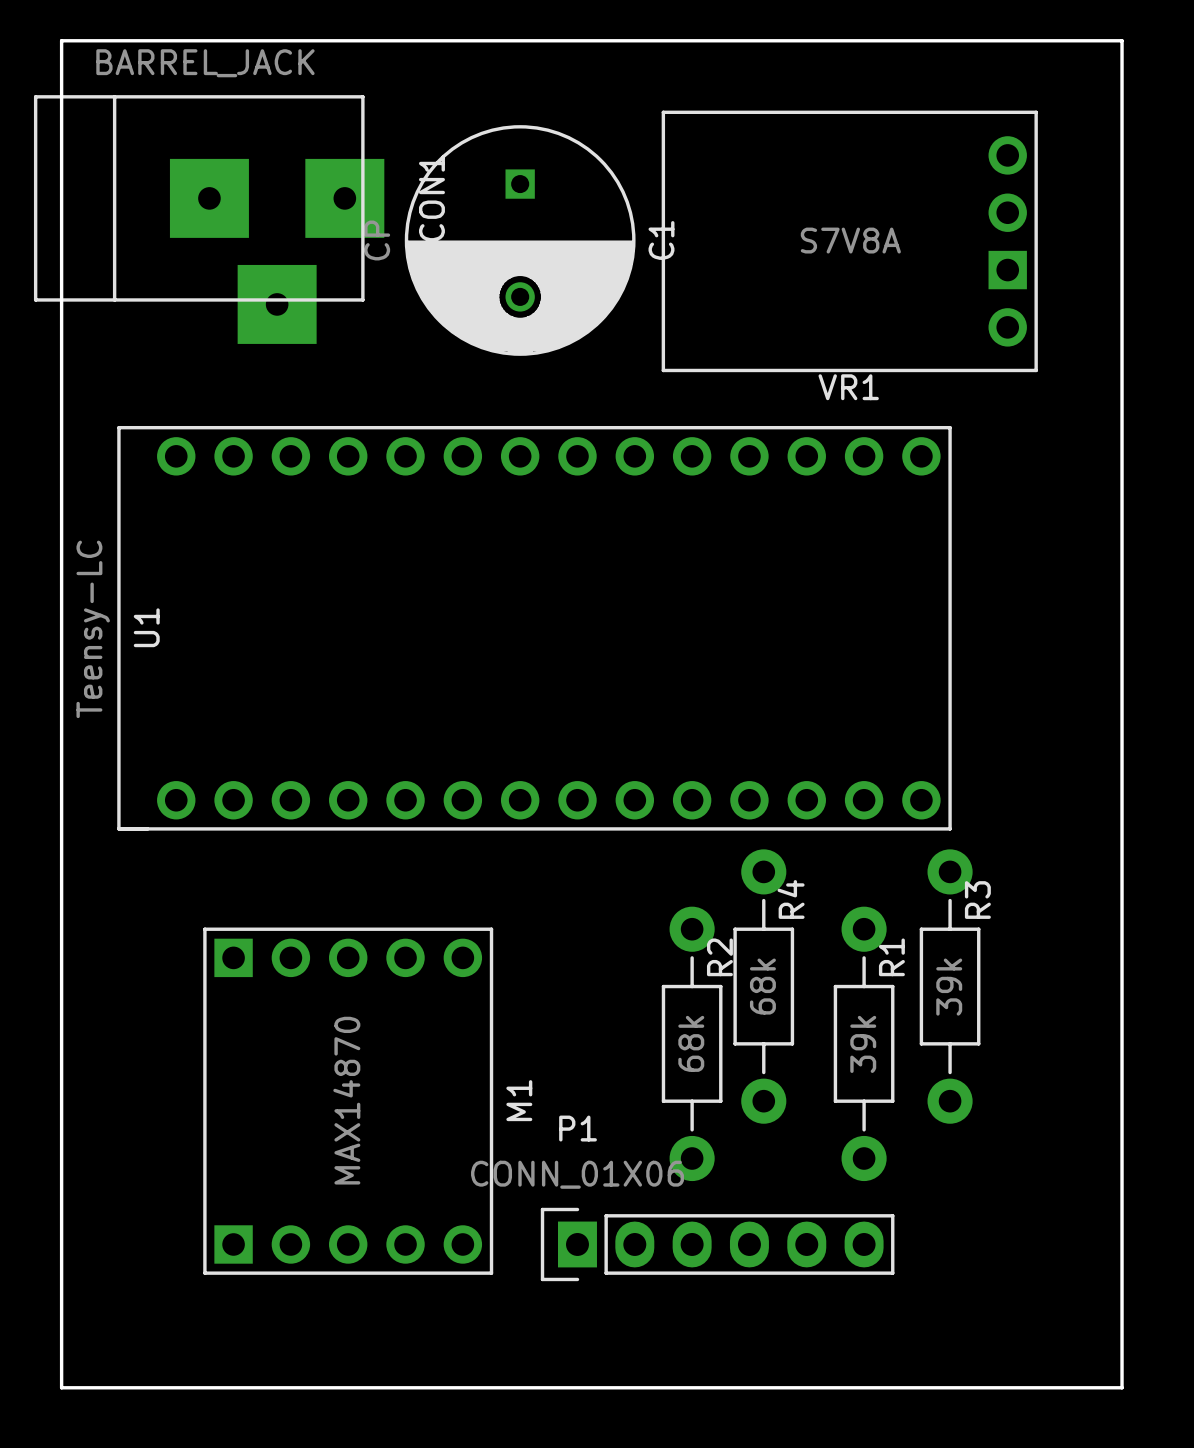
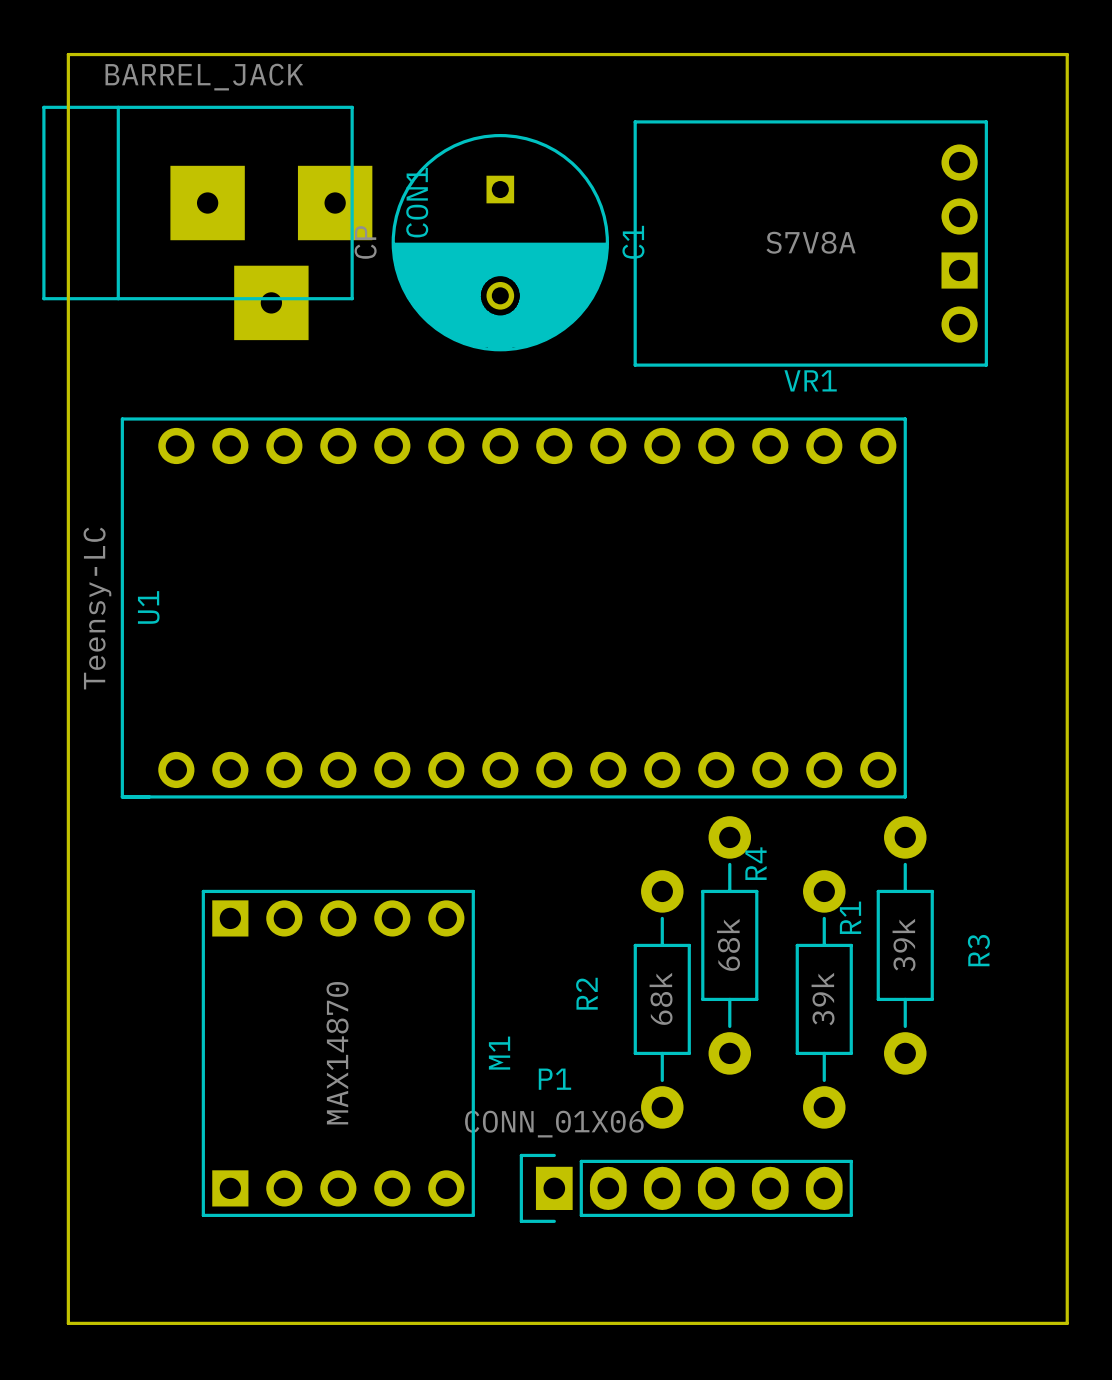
R3 name position: R3 (977, 900) -> R3 (978, 950)
R2 name position: R2 (719, 957) -> R2 (586, 993)

